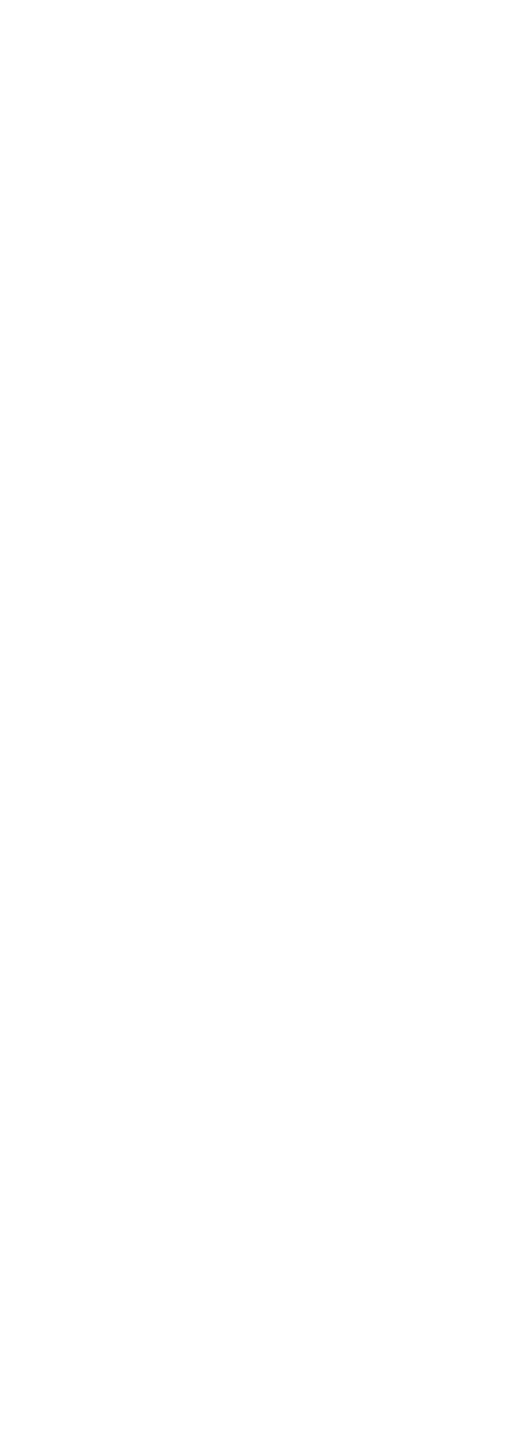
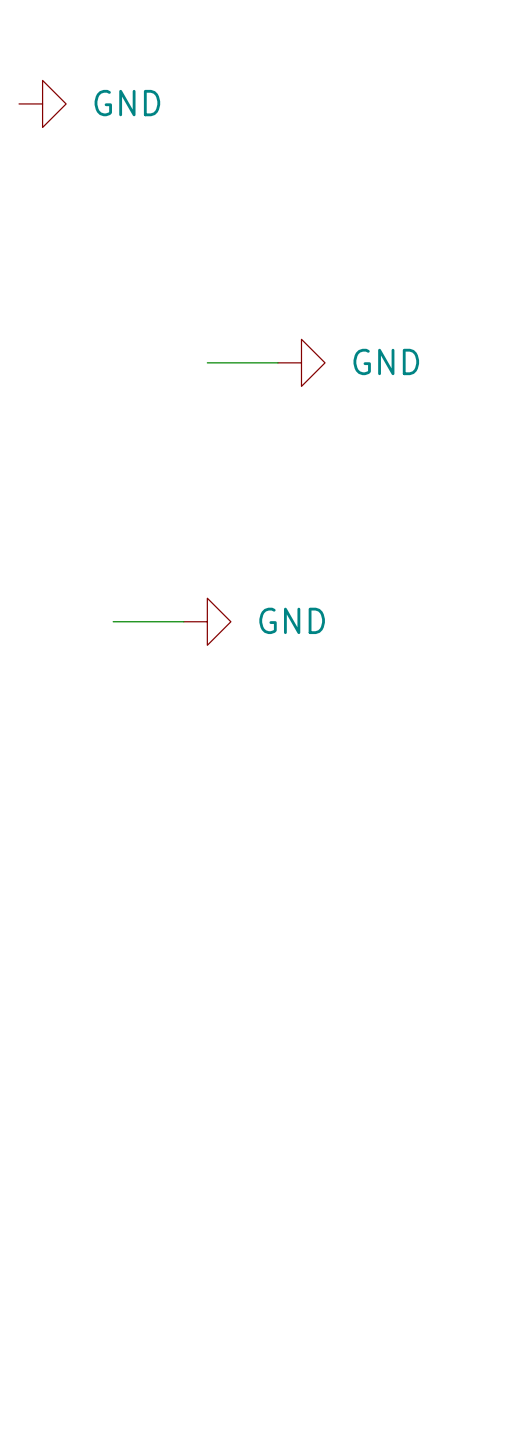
power symbol: none -> GND (42, 103)
wire: none -> (207, 362) (277, 362)
power symbol: none -> GND (301, 362)
wire: none -> (113, 621) (183, 621)
power symbol: none -> GND (207, 621)

